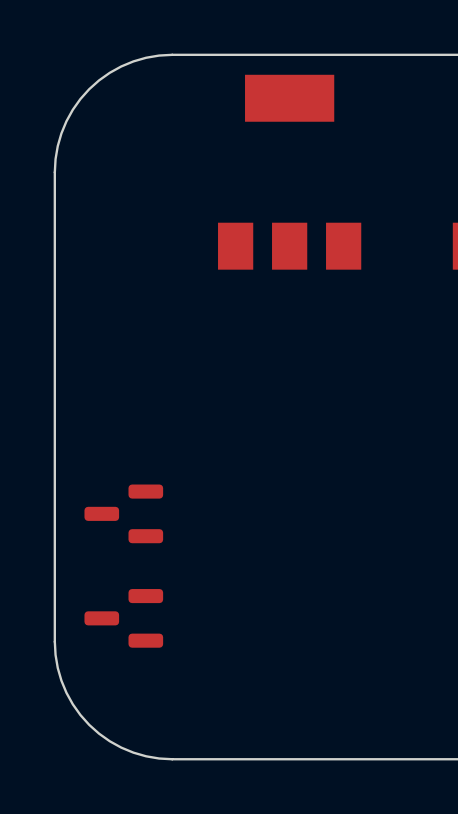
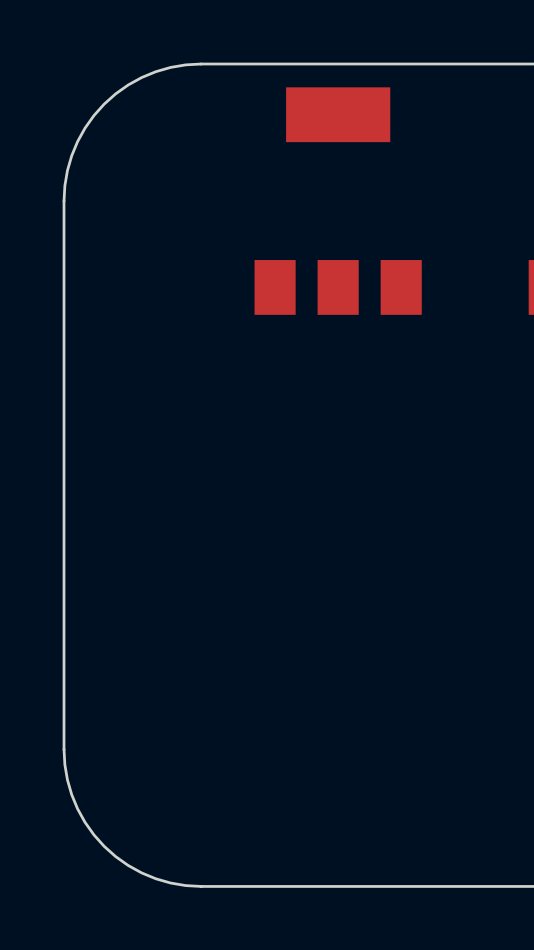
part: (123, 513) -> none
part: (123, 618) -> none

